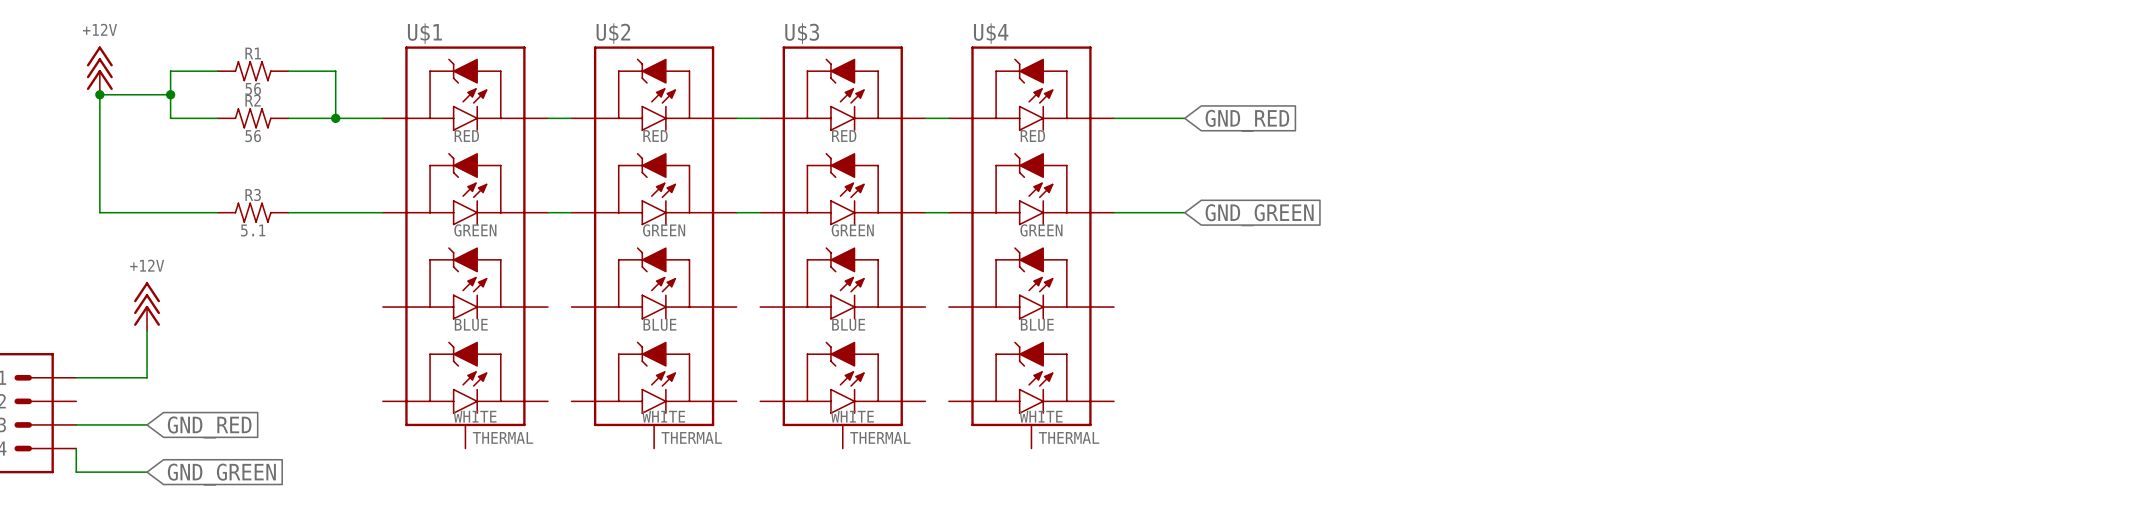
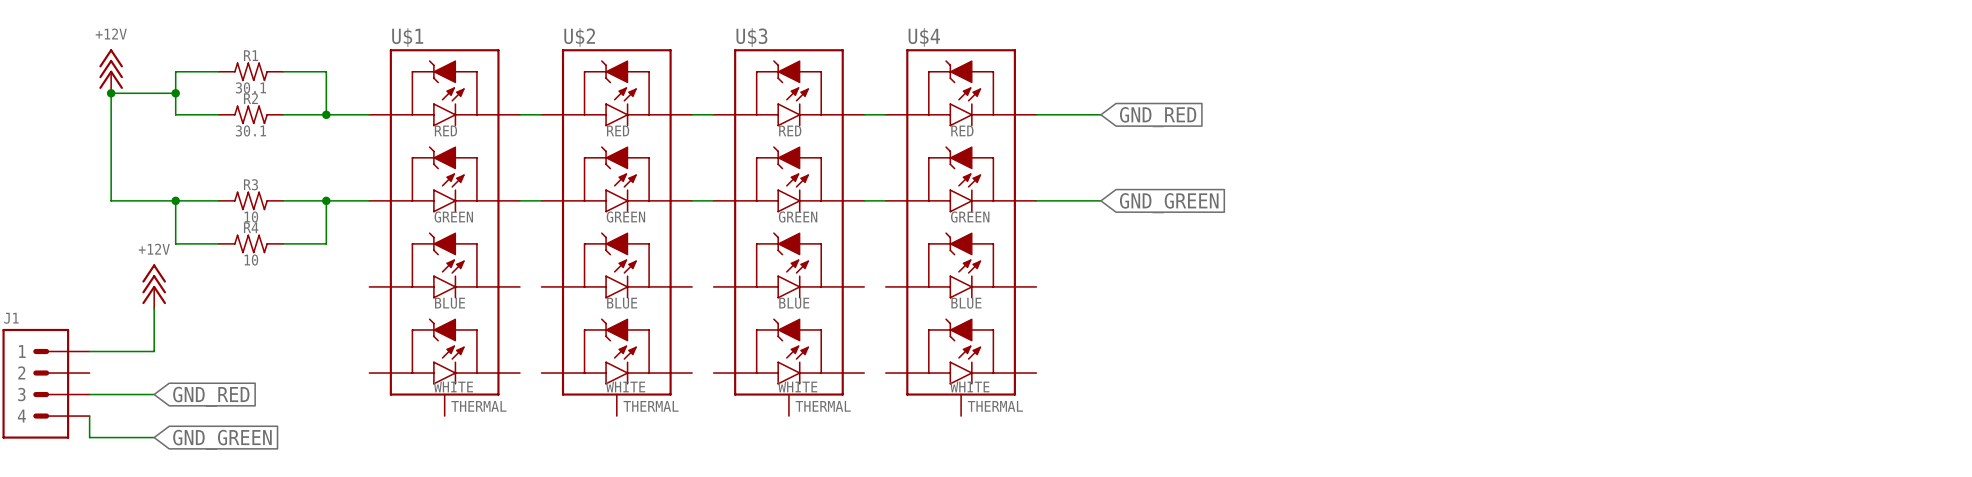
R1 text: 56 (253, 88) -> 30.1 (251, 87)
R2 text: 56 (253, 136) -> 30.1 (251, 130)
wire: none -> (175, 200) (175, 243) (218, 243)
junction: none -> (175, 200)
wire: none -> (326, 200) (326, 243) (283, 243)
junction: none -> (326, 200)
R3 text: 5.1 (253, 230) -> 10 (251, 217)
R4: none -> (251, 243)

